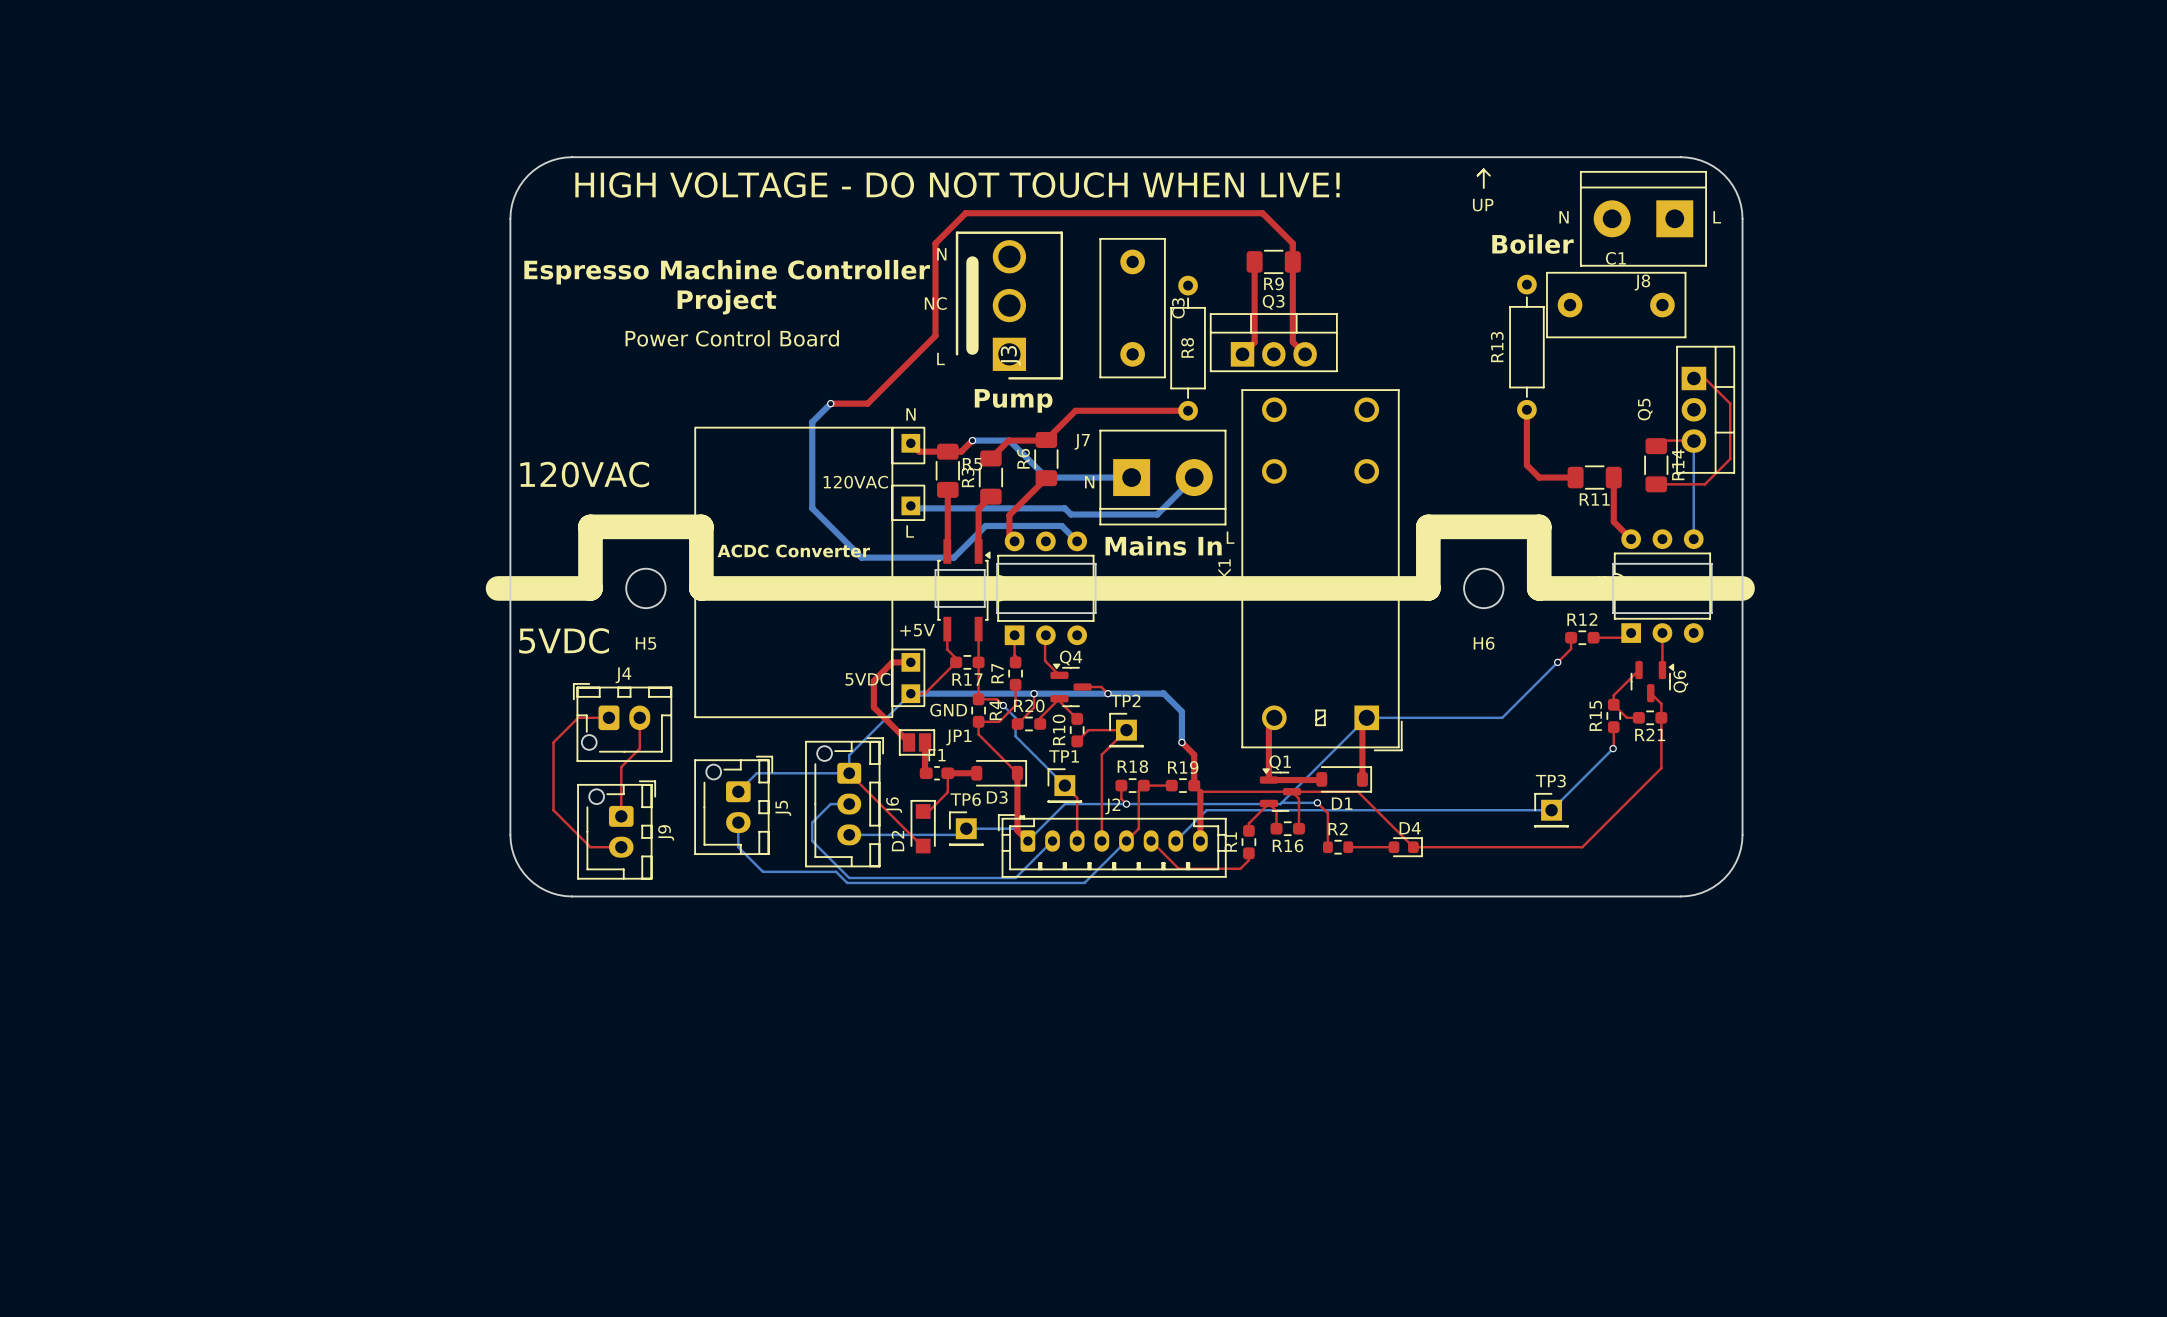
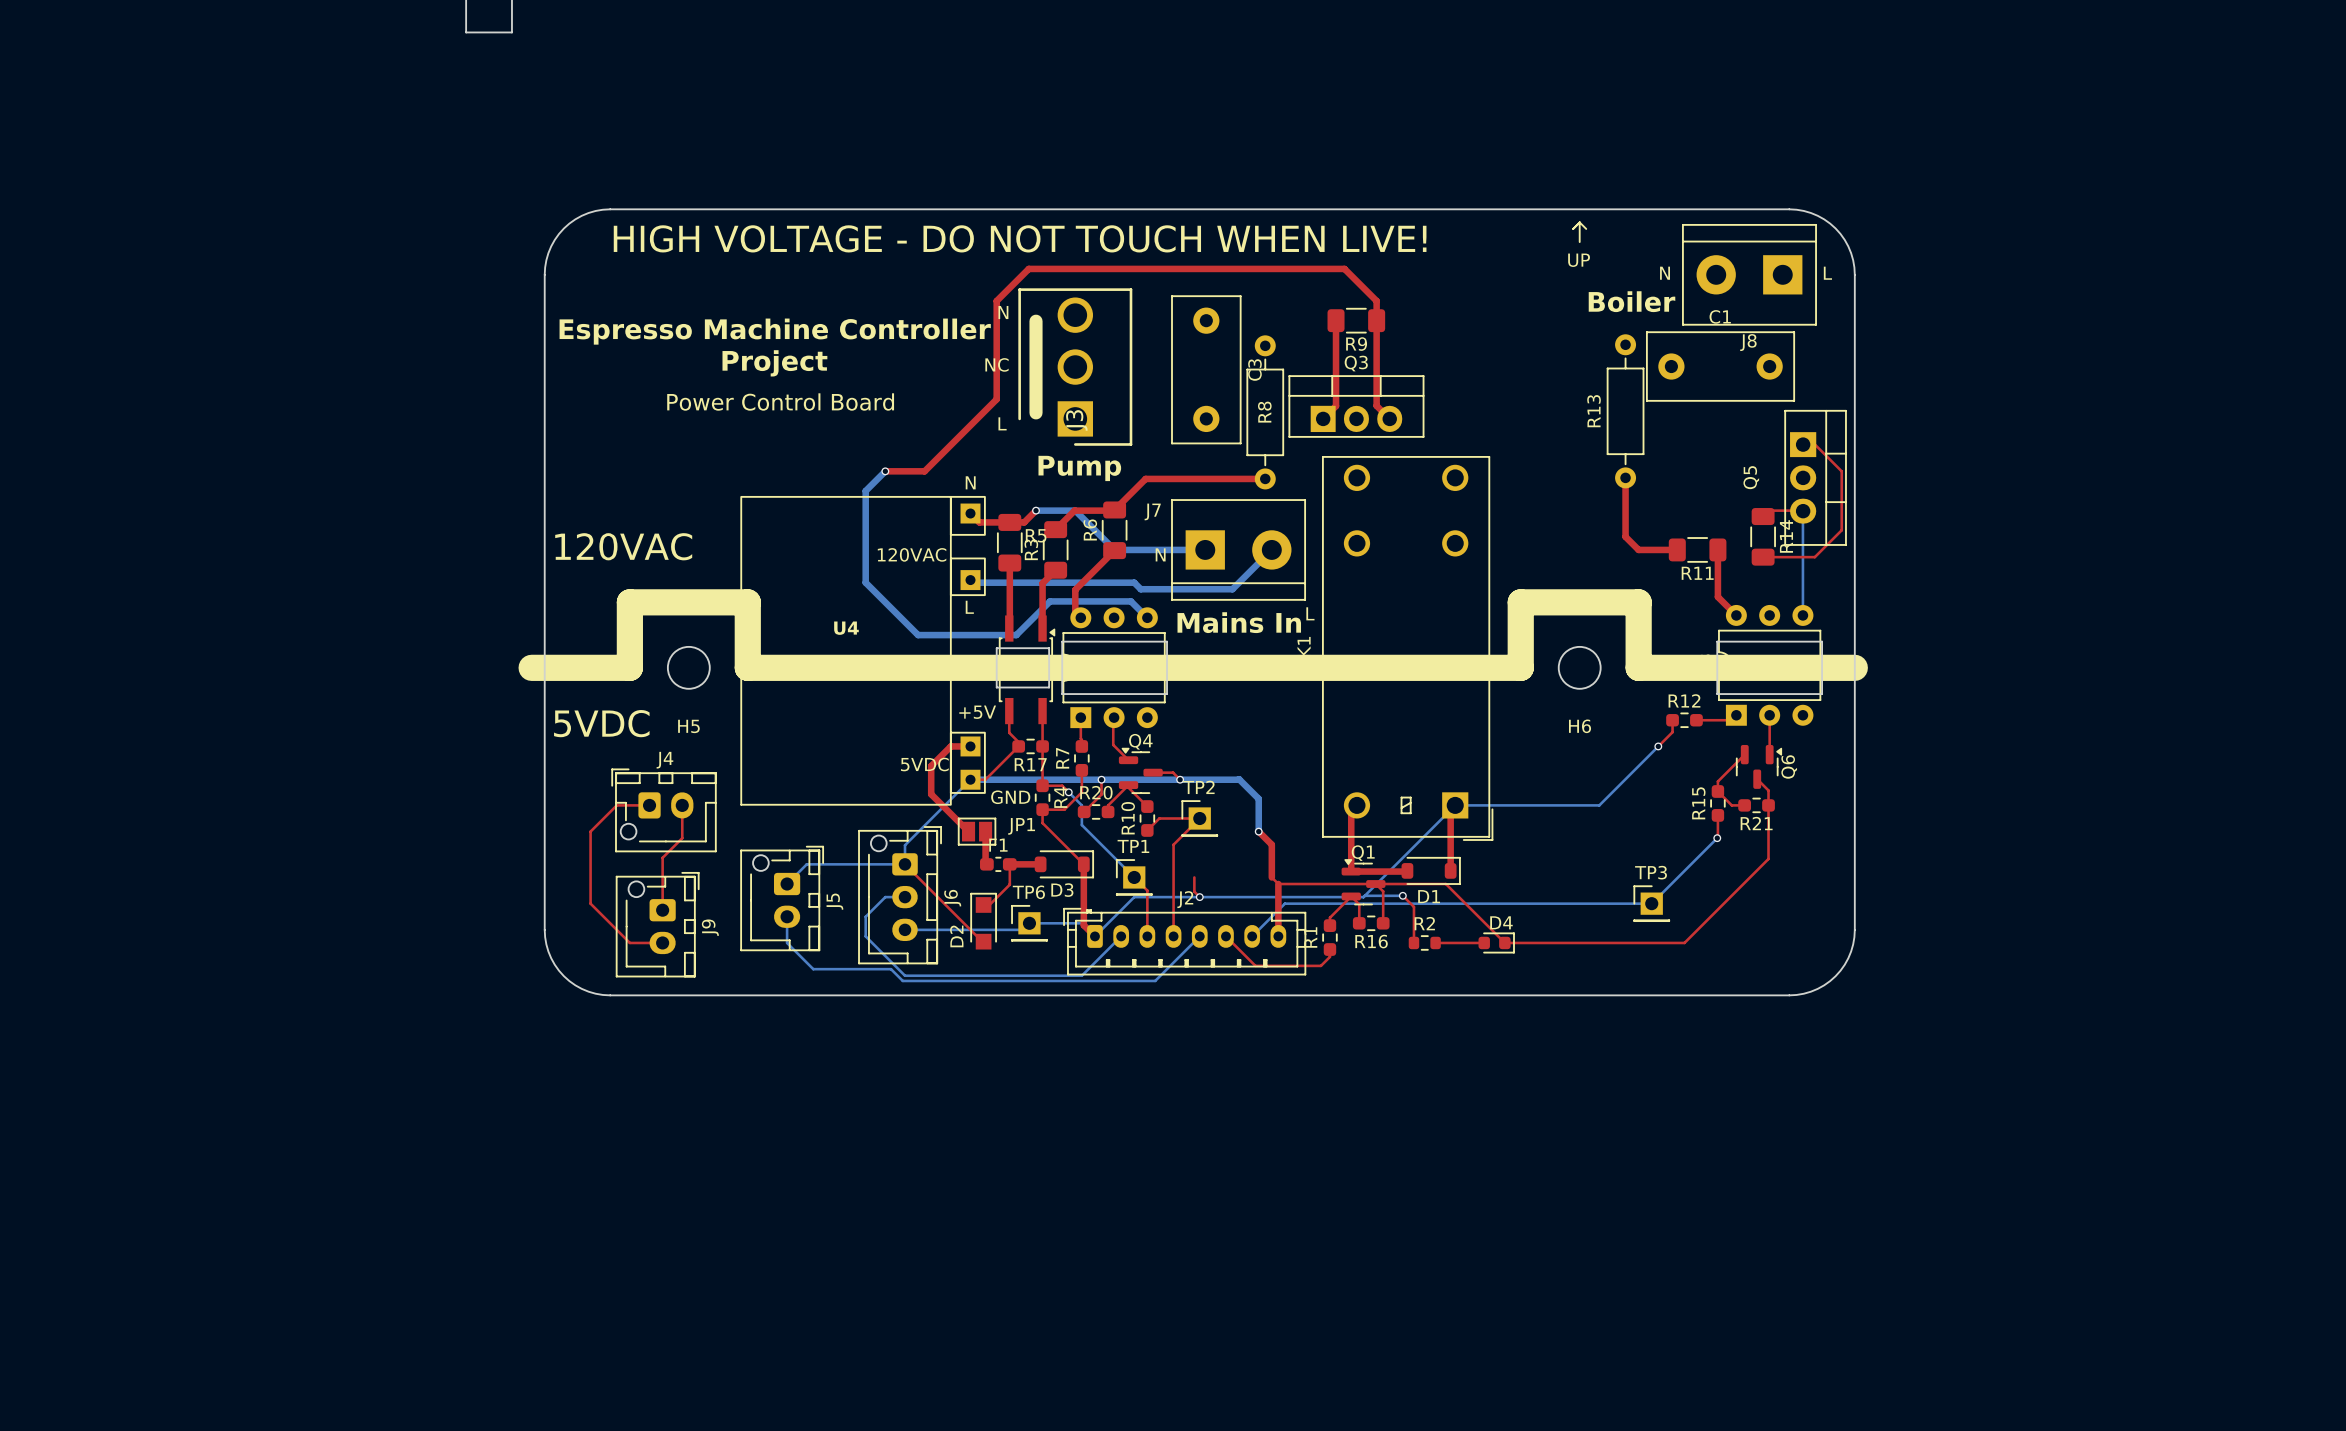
ACDC Converter name: ACDC Converter (793, 551) -> U4 (846, 628)
R18: (1132, 785) -> none
top track: (1171, 785) (1143, 785) (1138, 790) (1138, 828) (1126, 841) -> none
R19: (1182, 785) -> none

